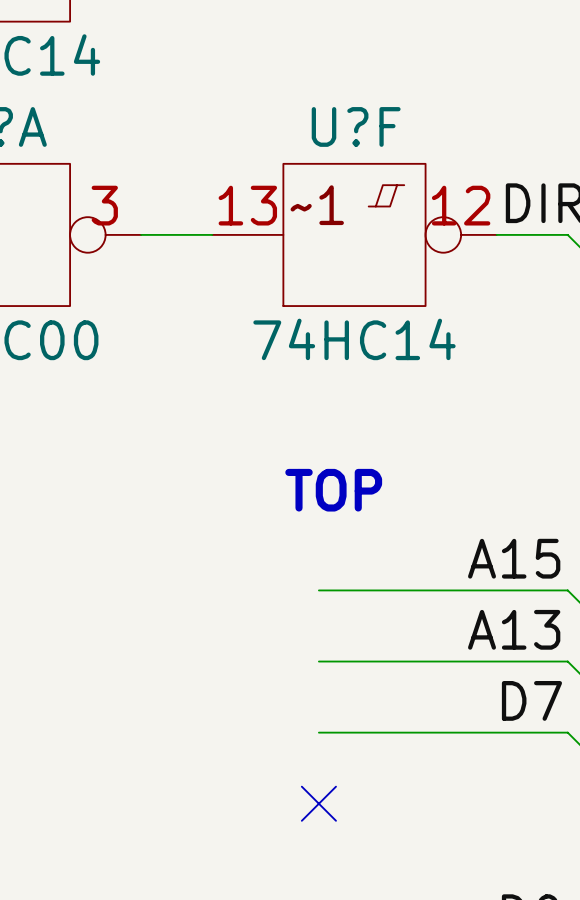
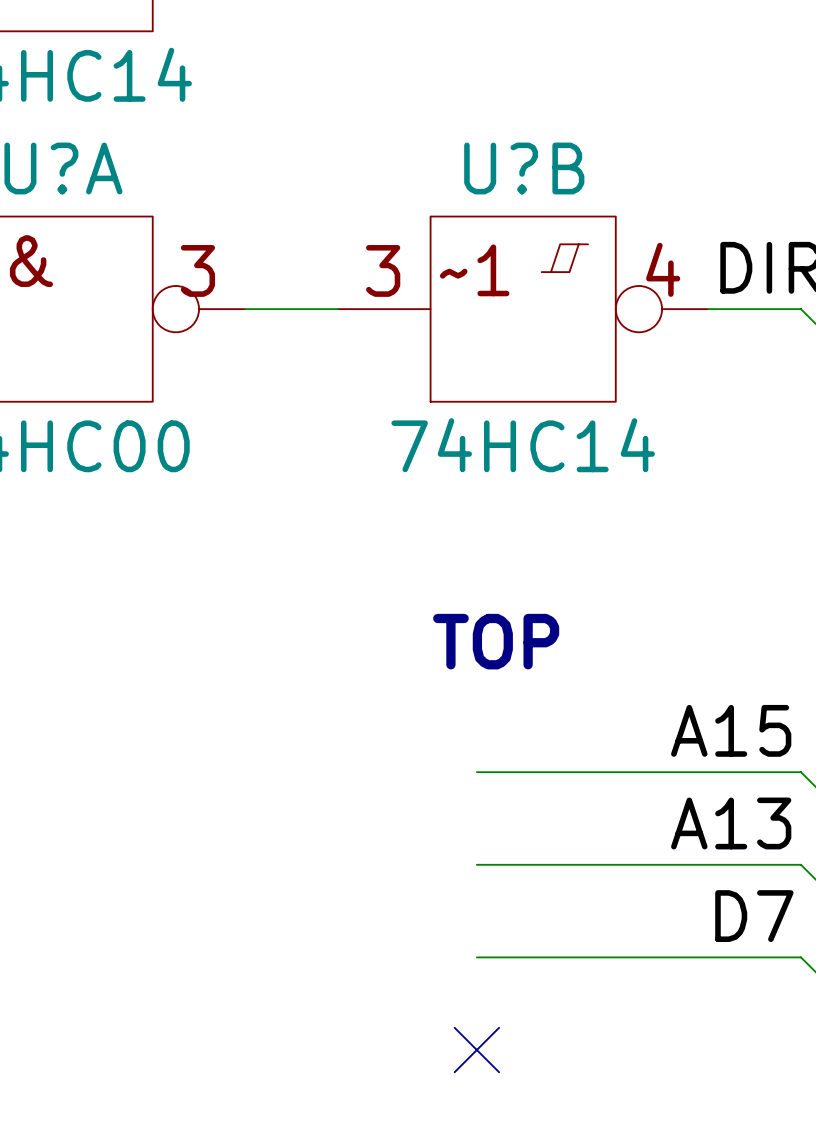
U?F name: U?F (356, 126) -> U?B (524, 168)
U?F pin number: 13 (247, 205) -> 3 (383, 270)
U?F pin number: 12 (461, 205) -> 4 (663, 269)

